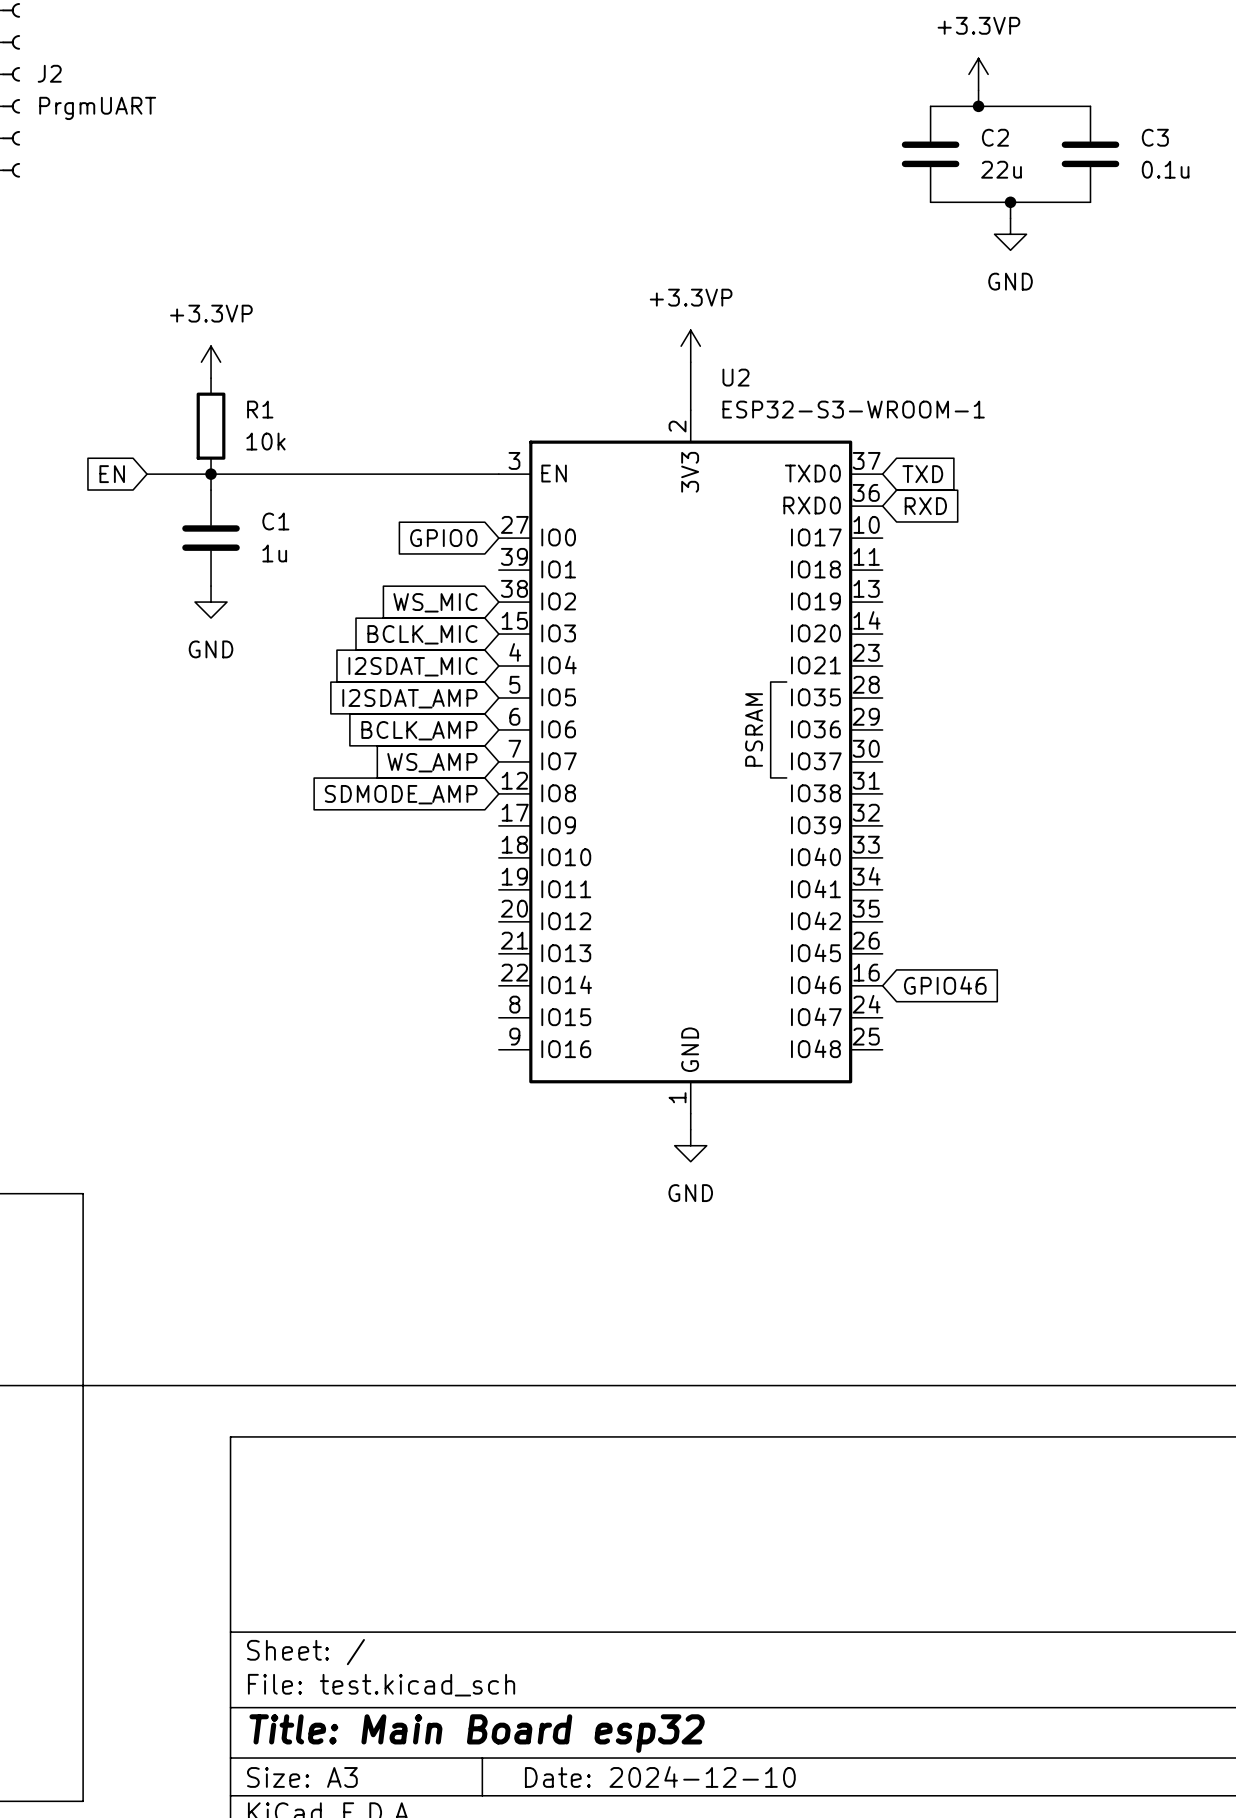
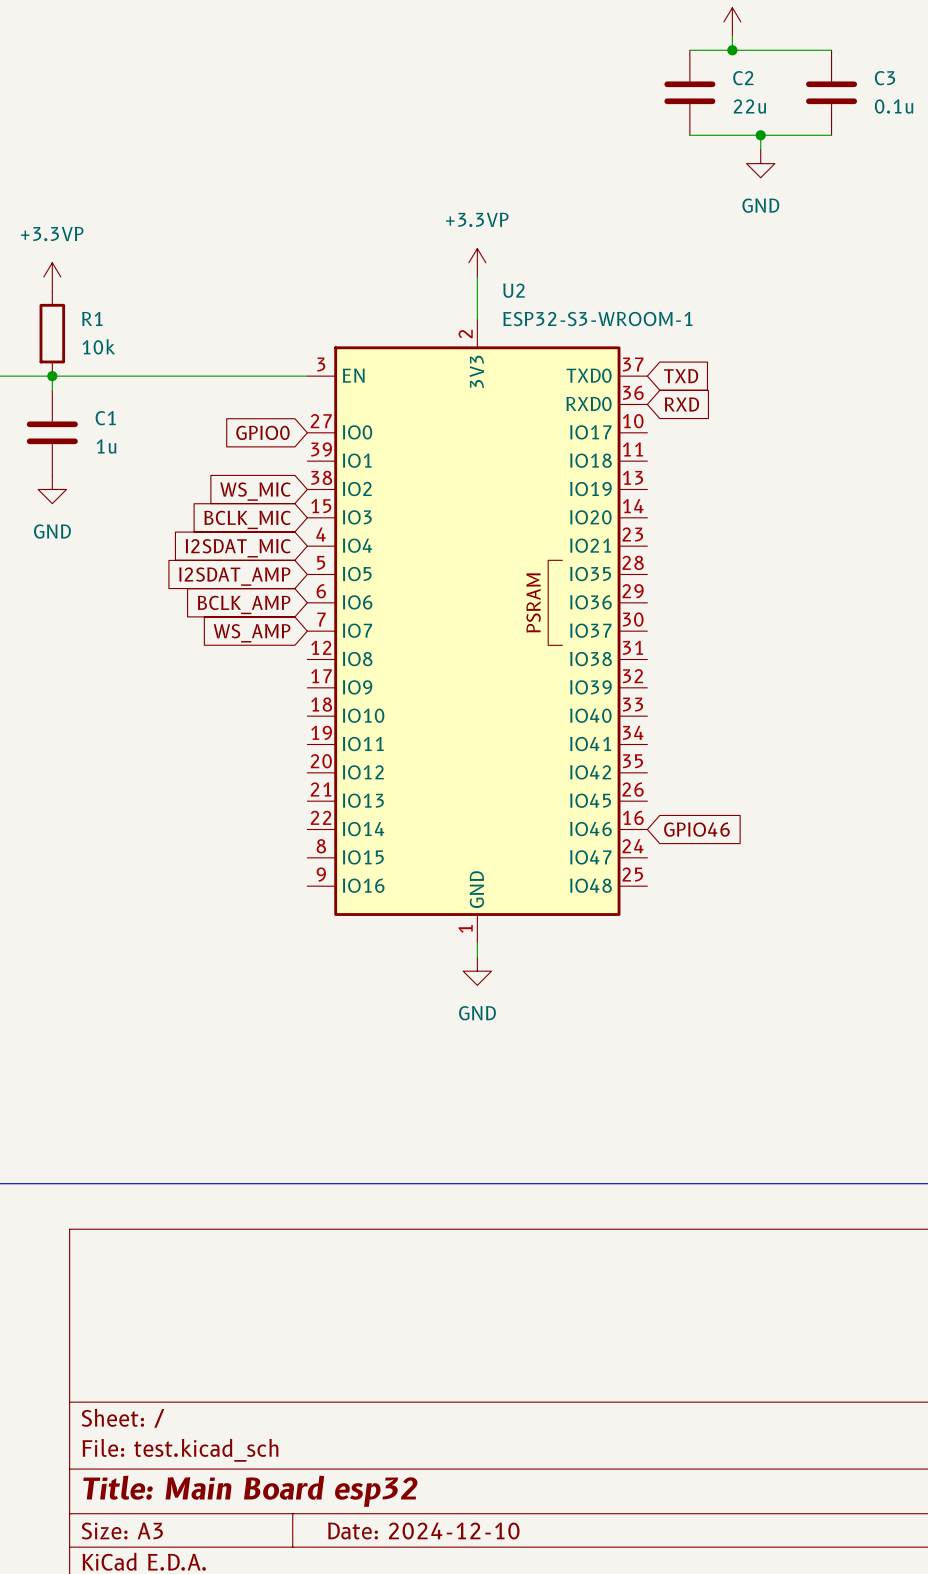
global label: SDMODE_AMP (401, 794) -> none

